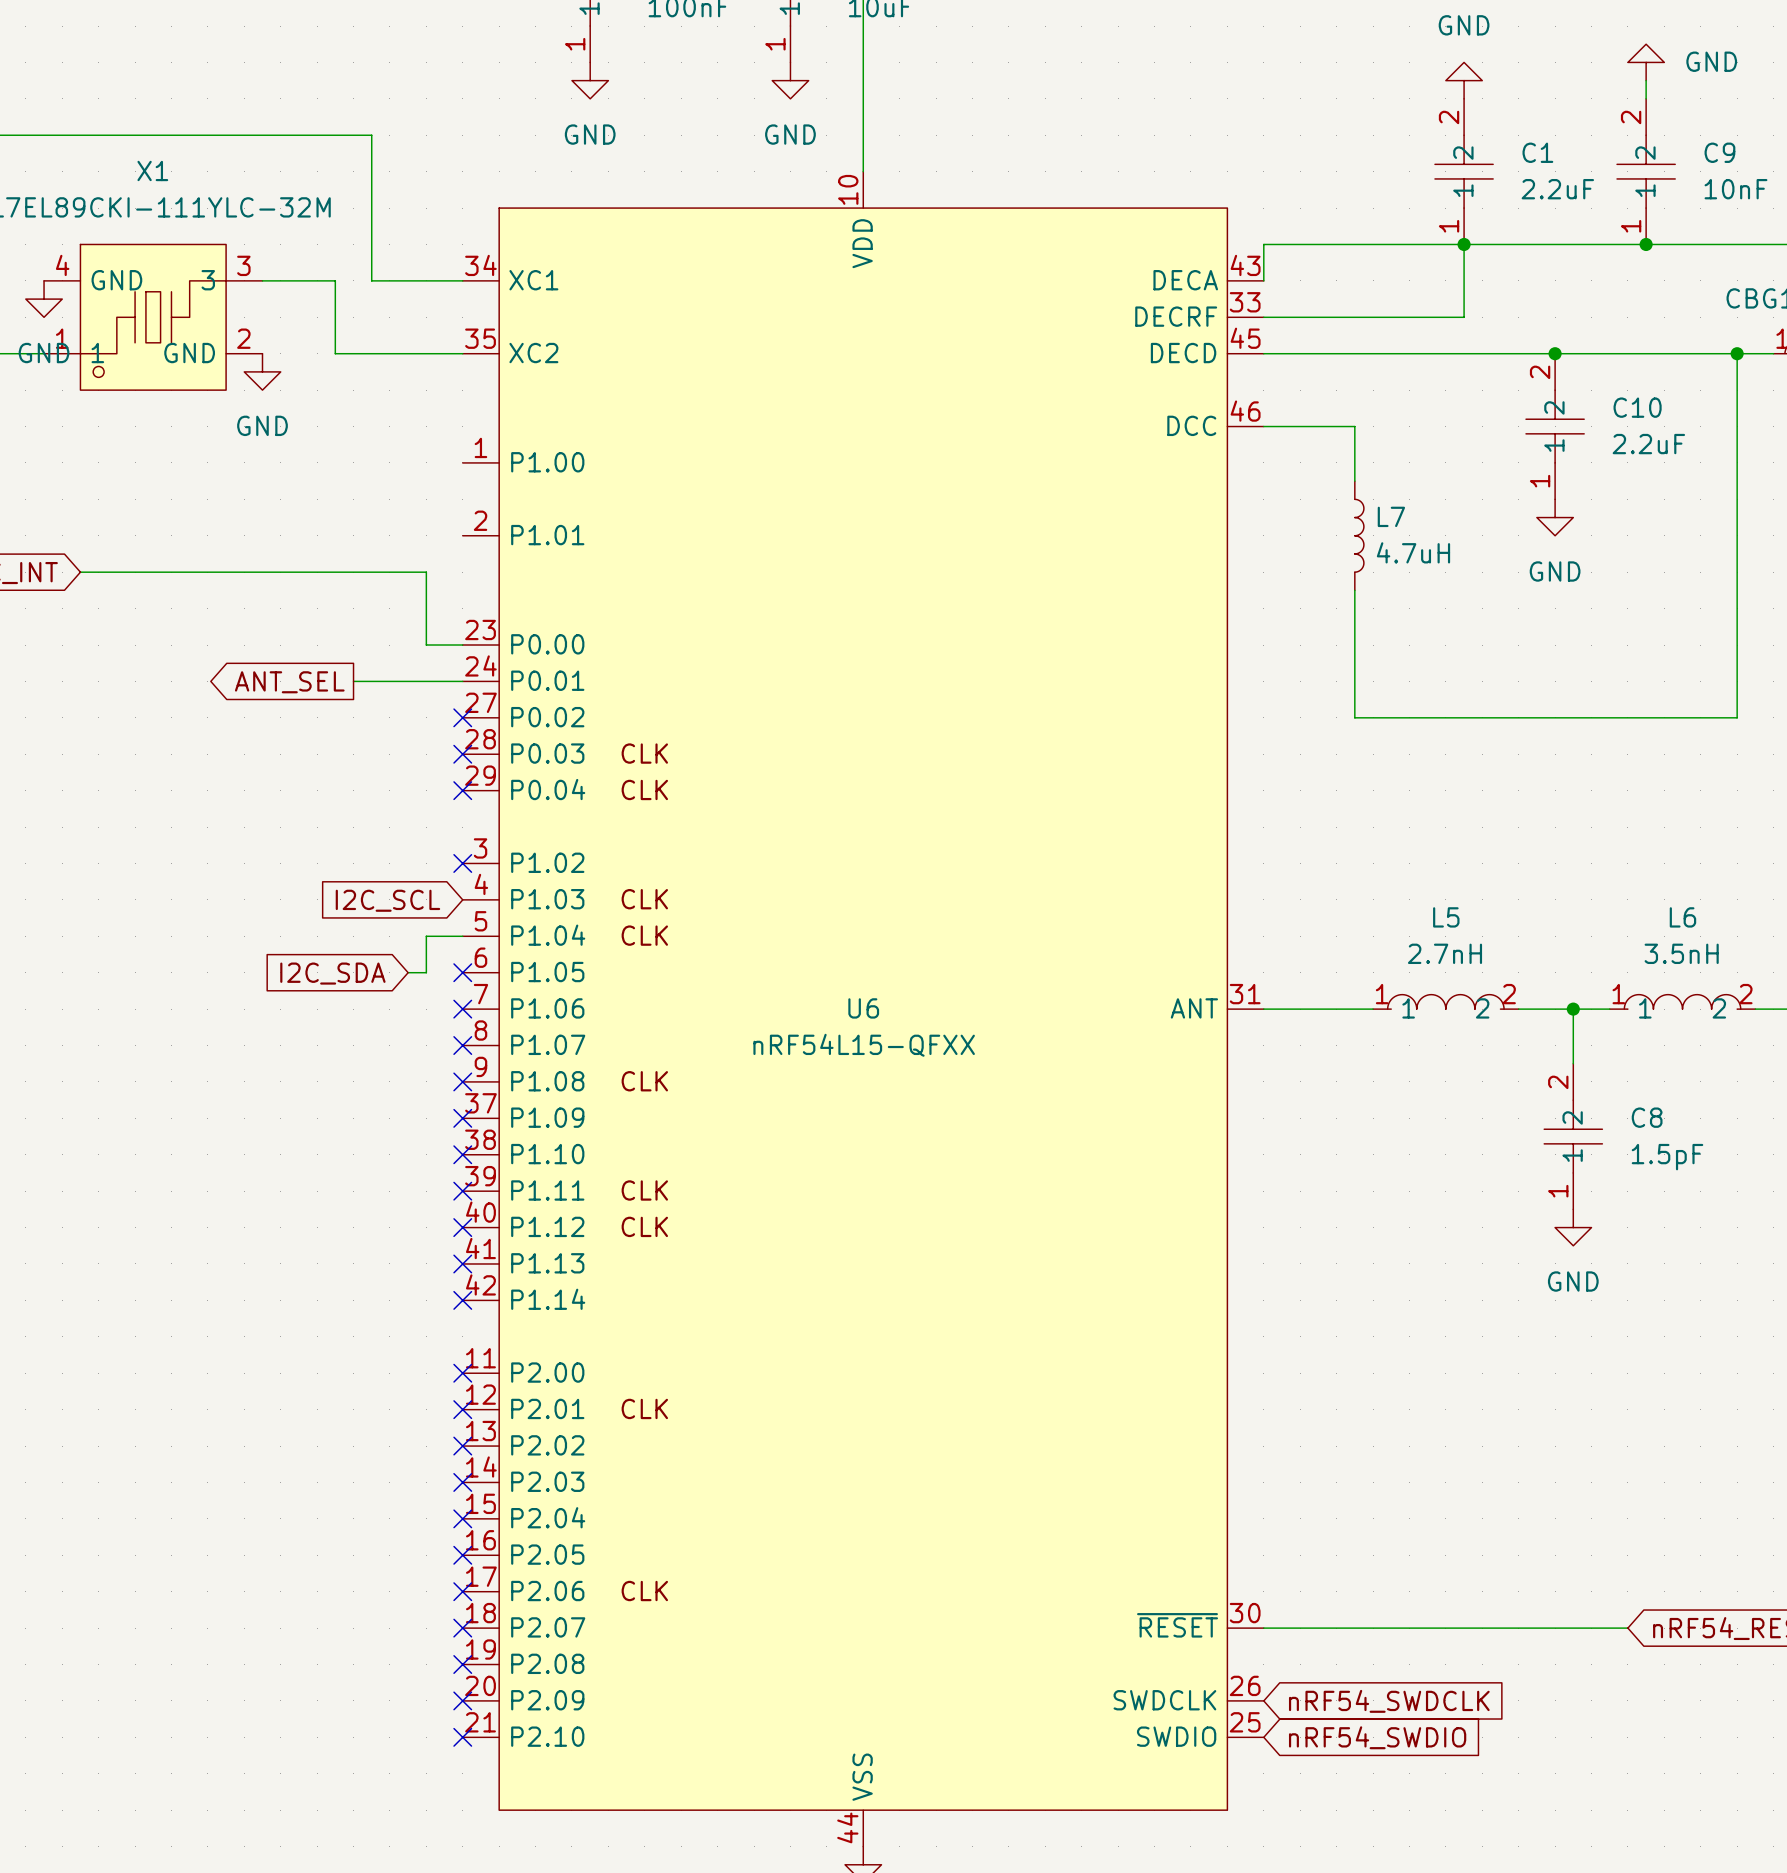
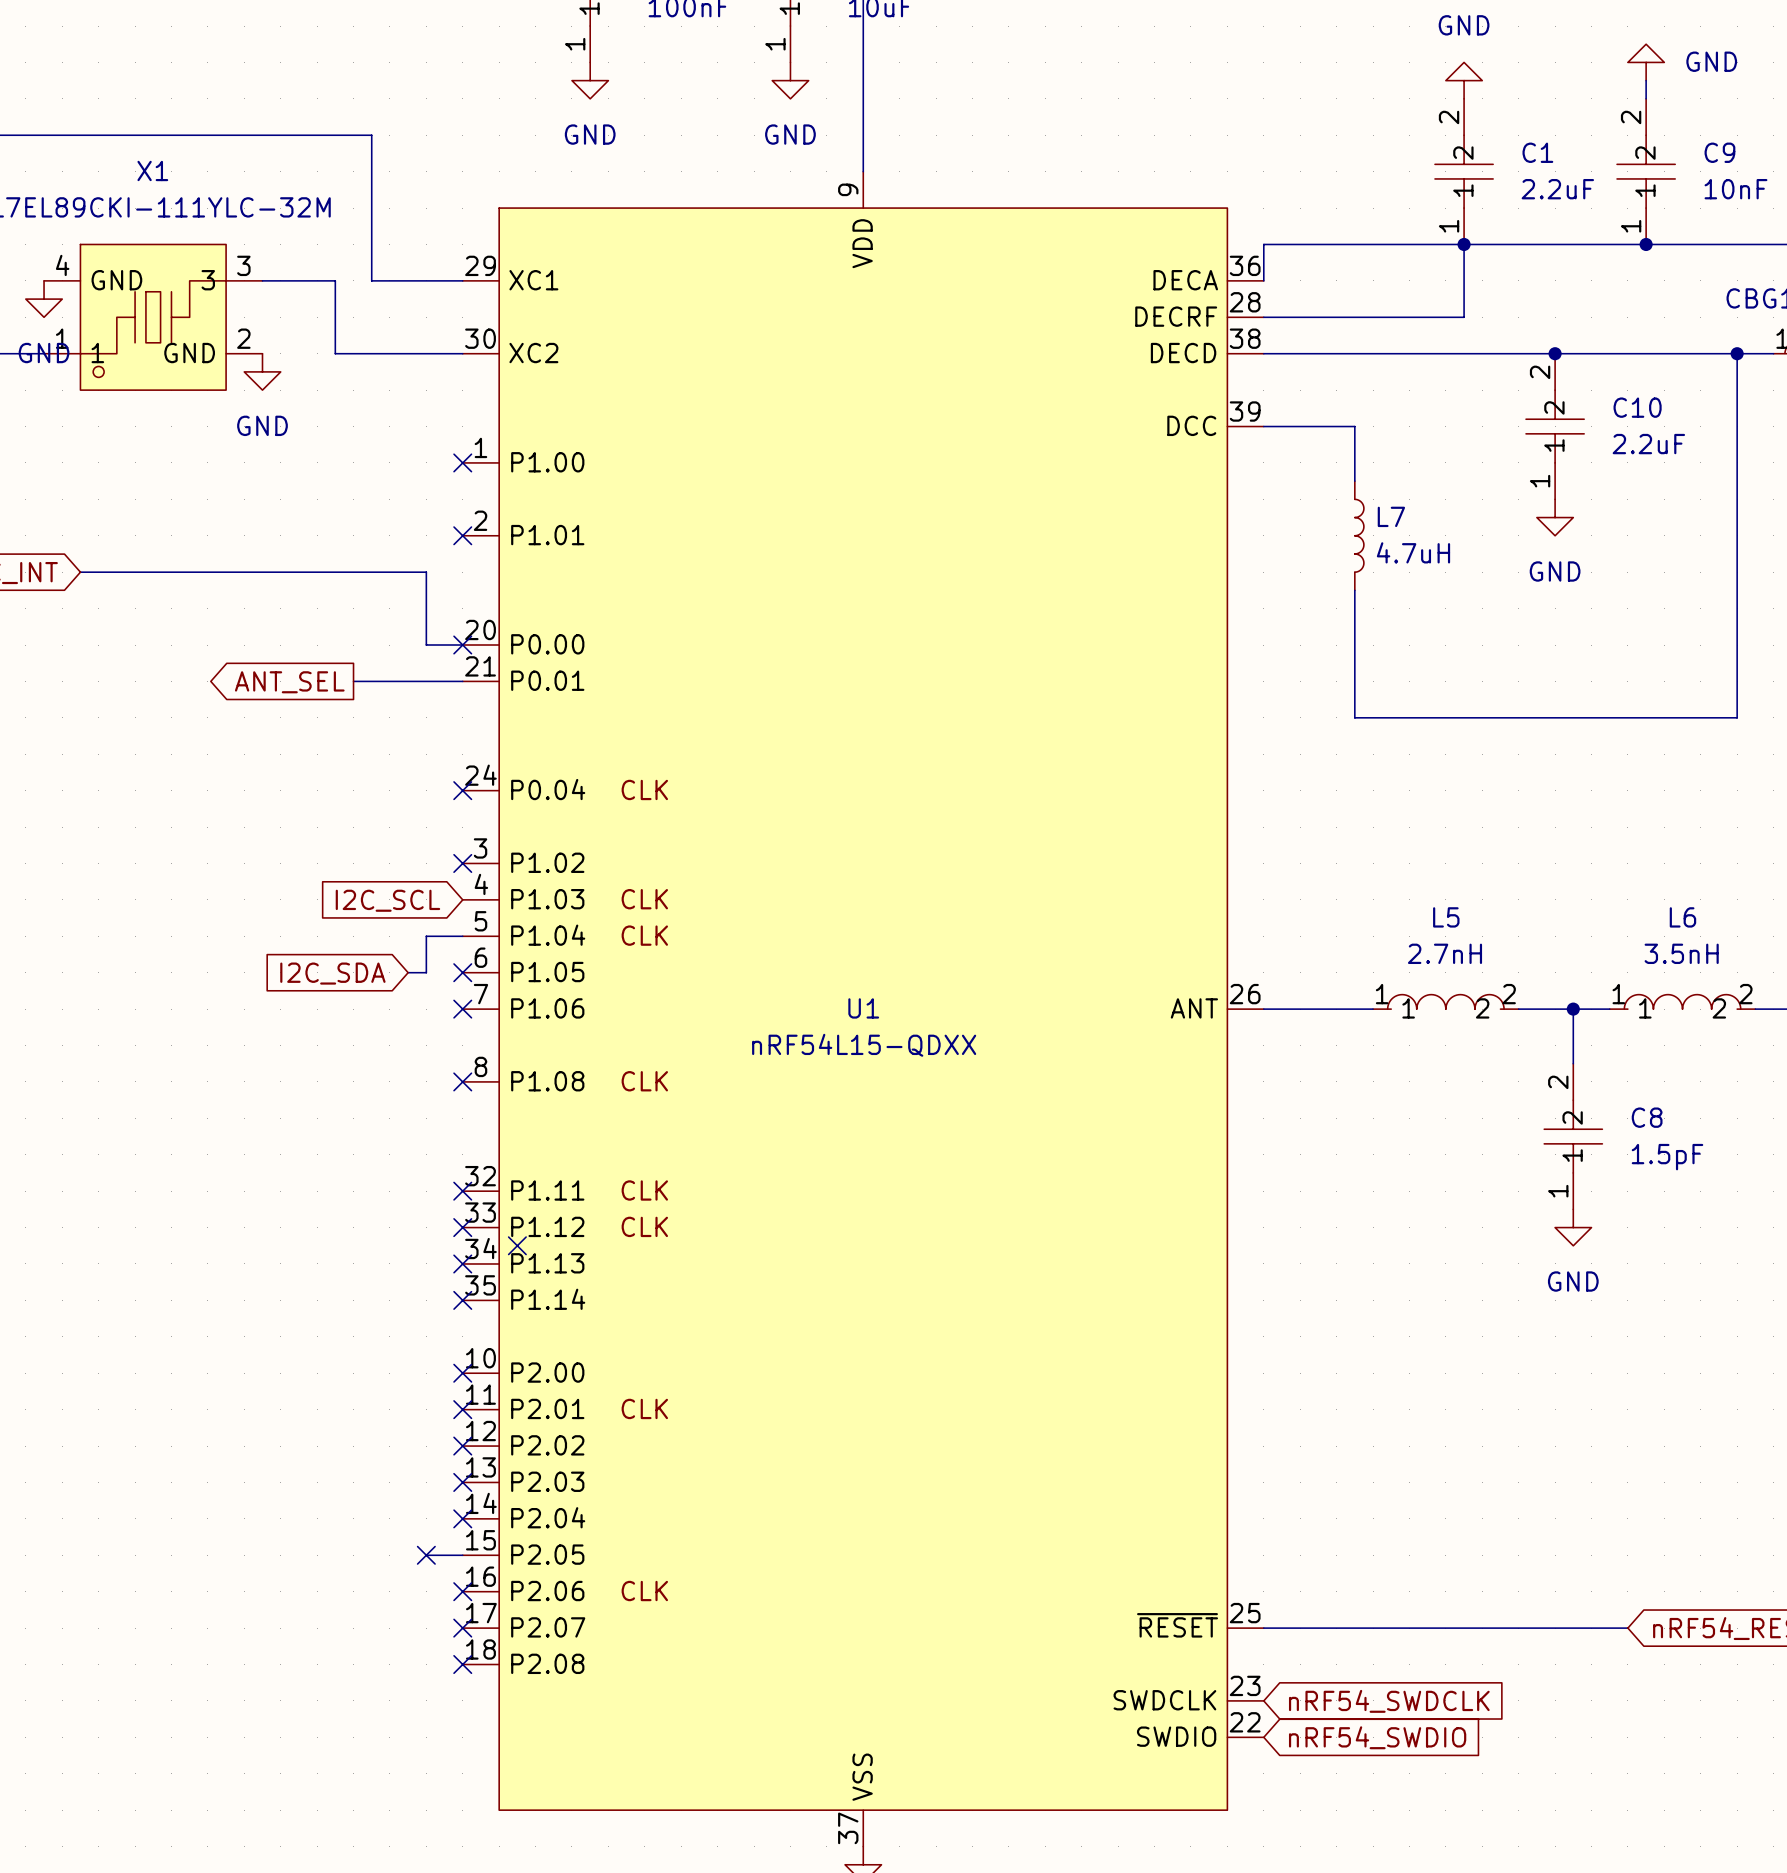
no-connect mark: none -> (462, 462)
no-connect mark: none -> (462, 535)
no-connect mark: none -> (462, 645)
no-connect mark: (462, 717) -> none
no-connect mark: (462, 754) -> none
U6: nRF54L15-QFXX (863, 1009) -> none
U1: none -> nRF54L15-QDXX (863, 1009)
no-connect mark: (462, 1045) -> none
no-connect mark: (462, 1118) -> none
no-connect mark: (462, 1154) -> none
no-connect mark: none -> (517, 1245)
wire: none -> (426, 1555) (462, 1555)
no-connect mark position: (462, 1555) -> (426, 1555)
no-connect mark: (462, 1700) -> none
no-connect mark: (462, 1737) -> none

